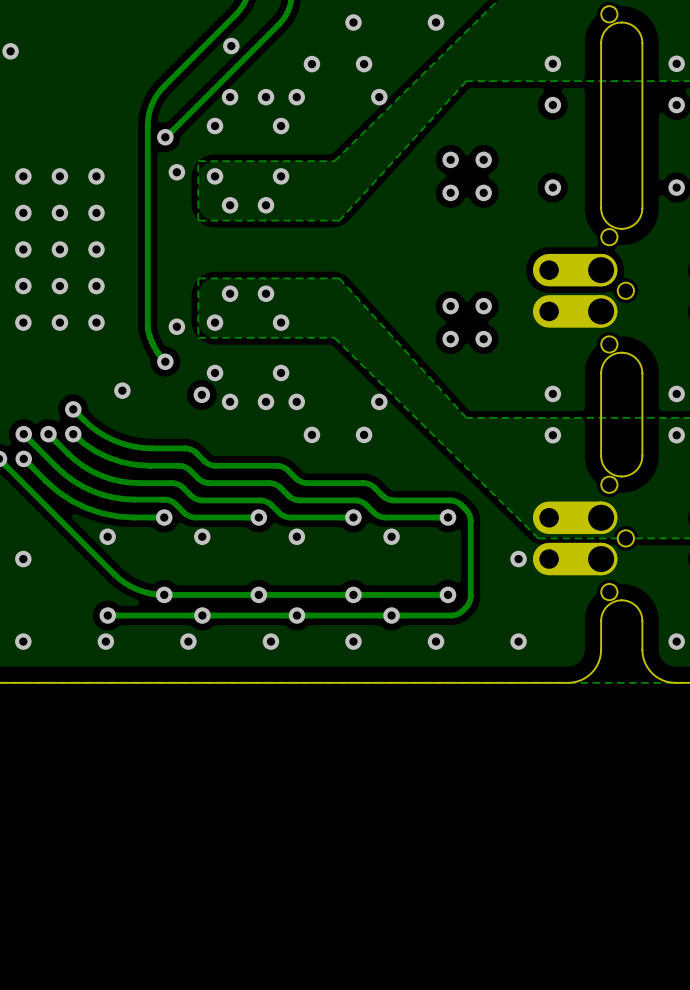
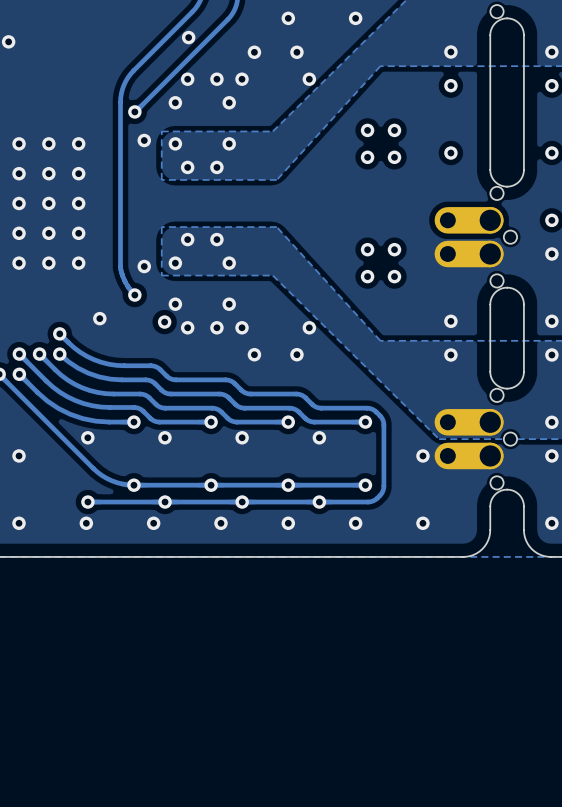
via: none -> (551, 220)
via: none -> (551, 253)
via: none -> (551, 422)
via: none -> (551, 455)

